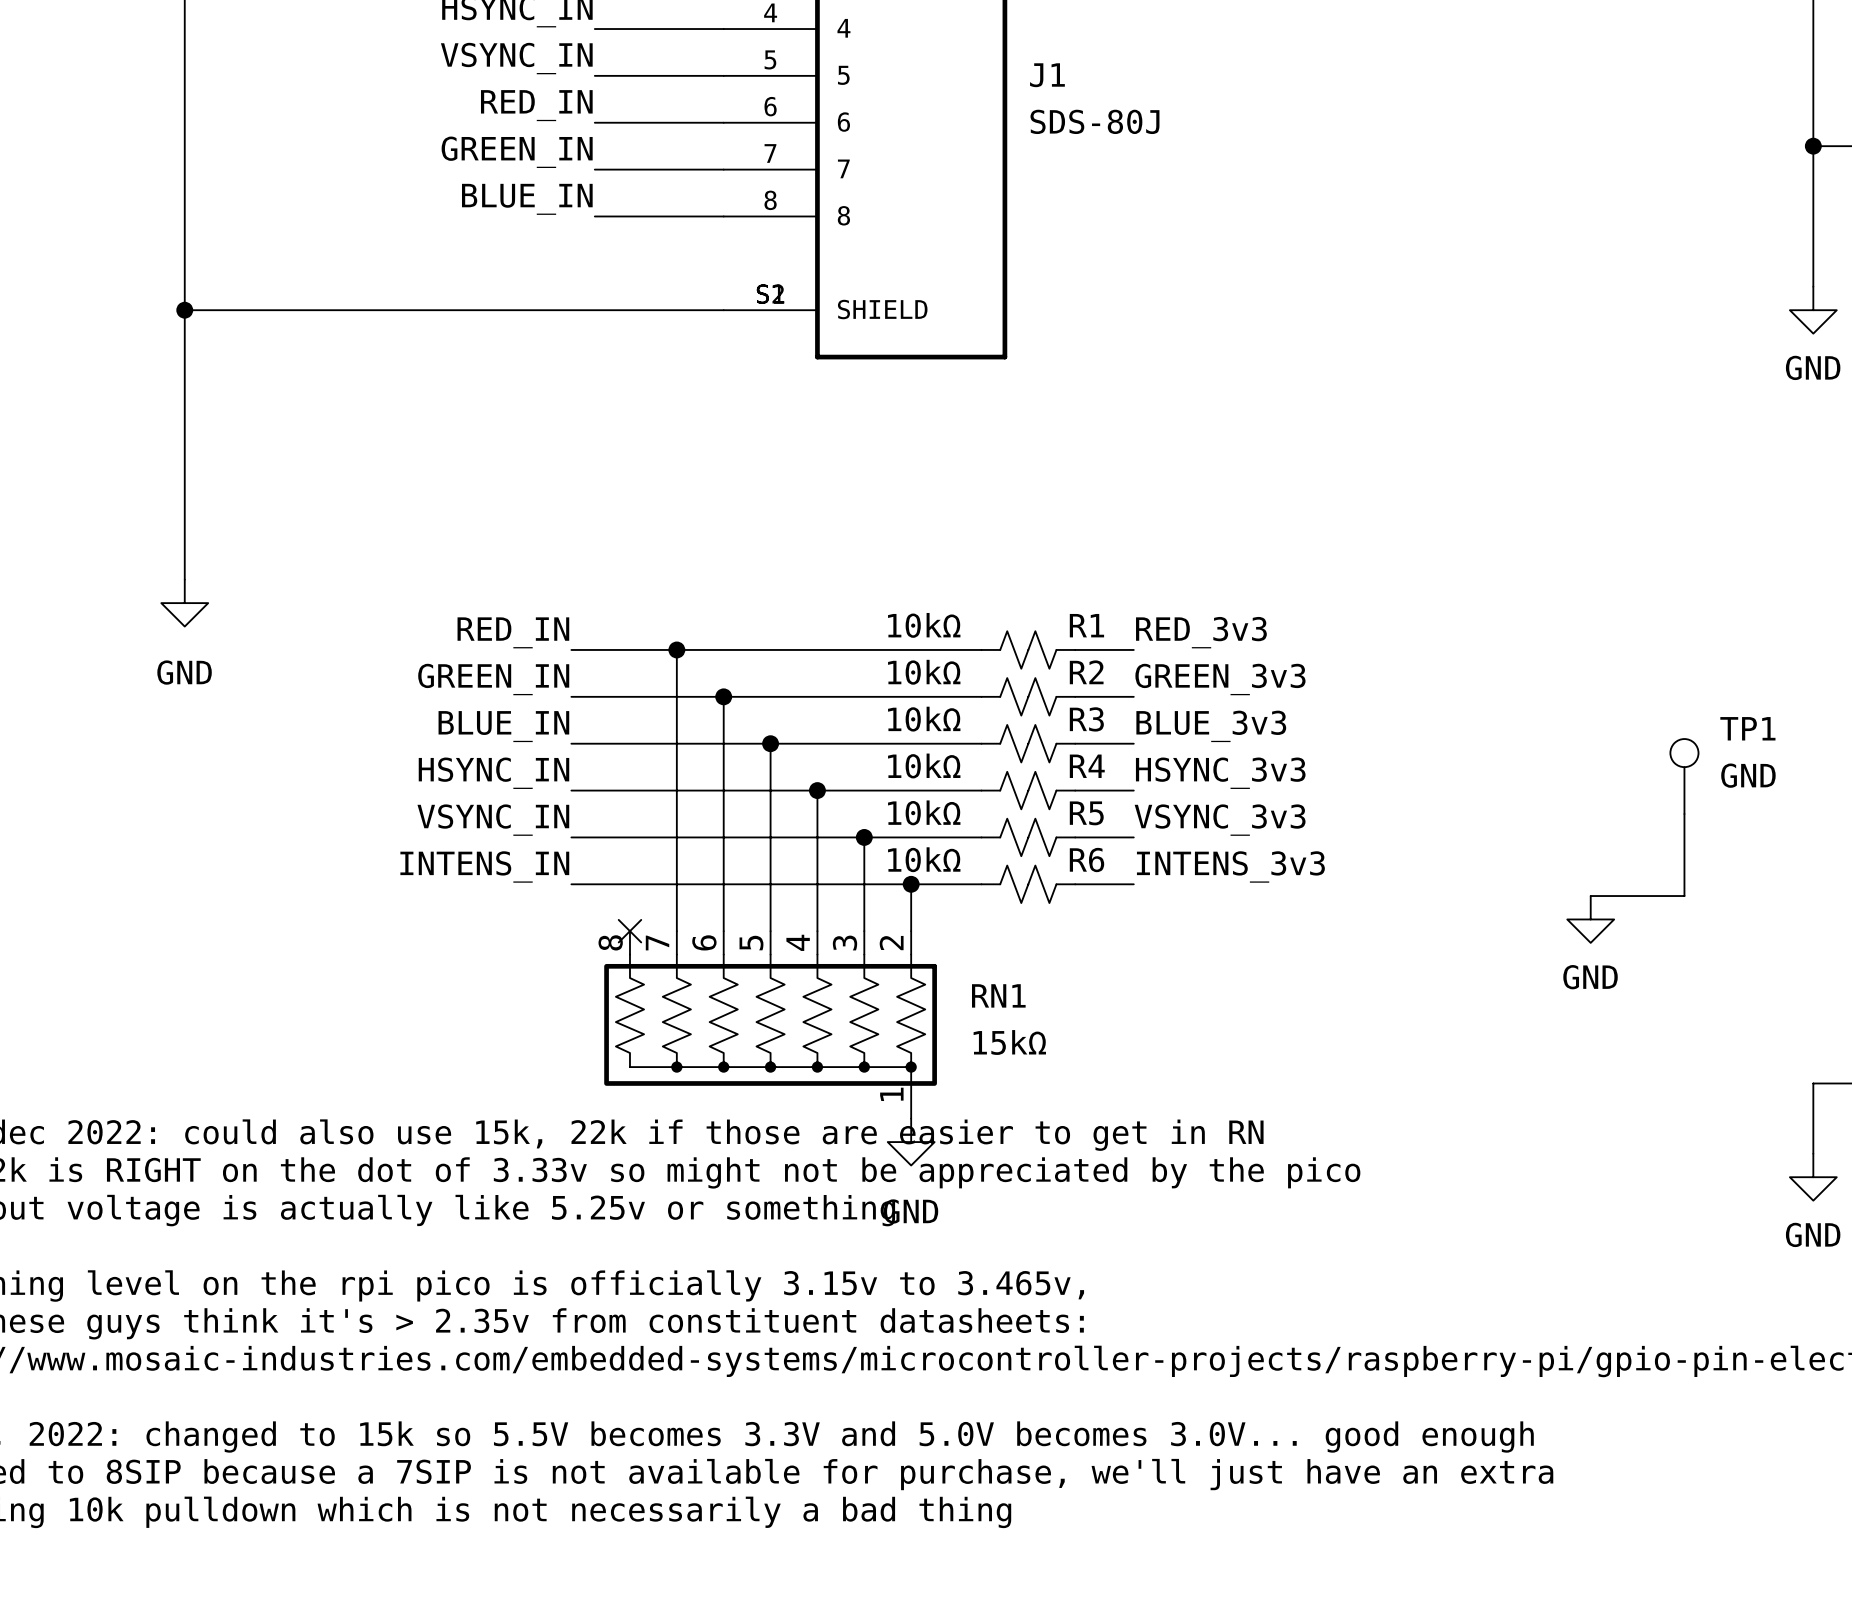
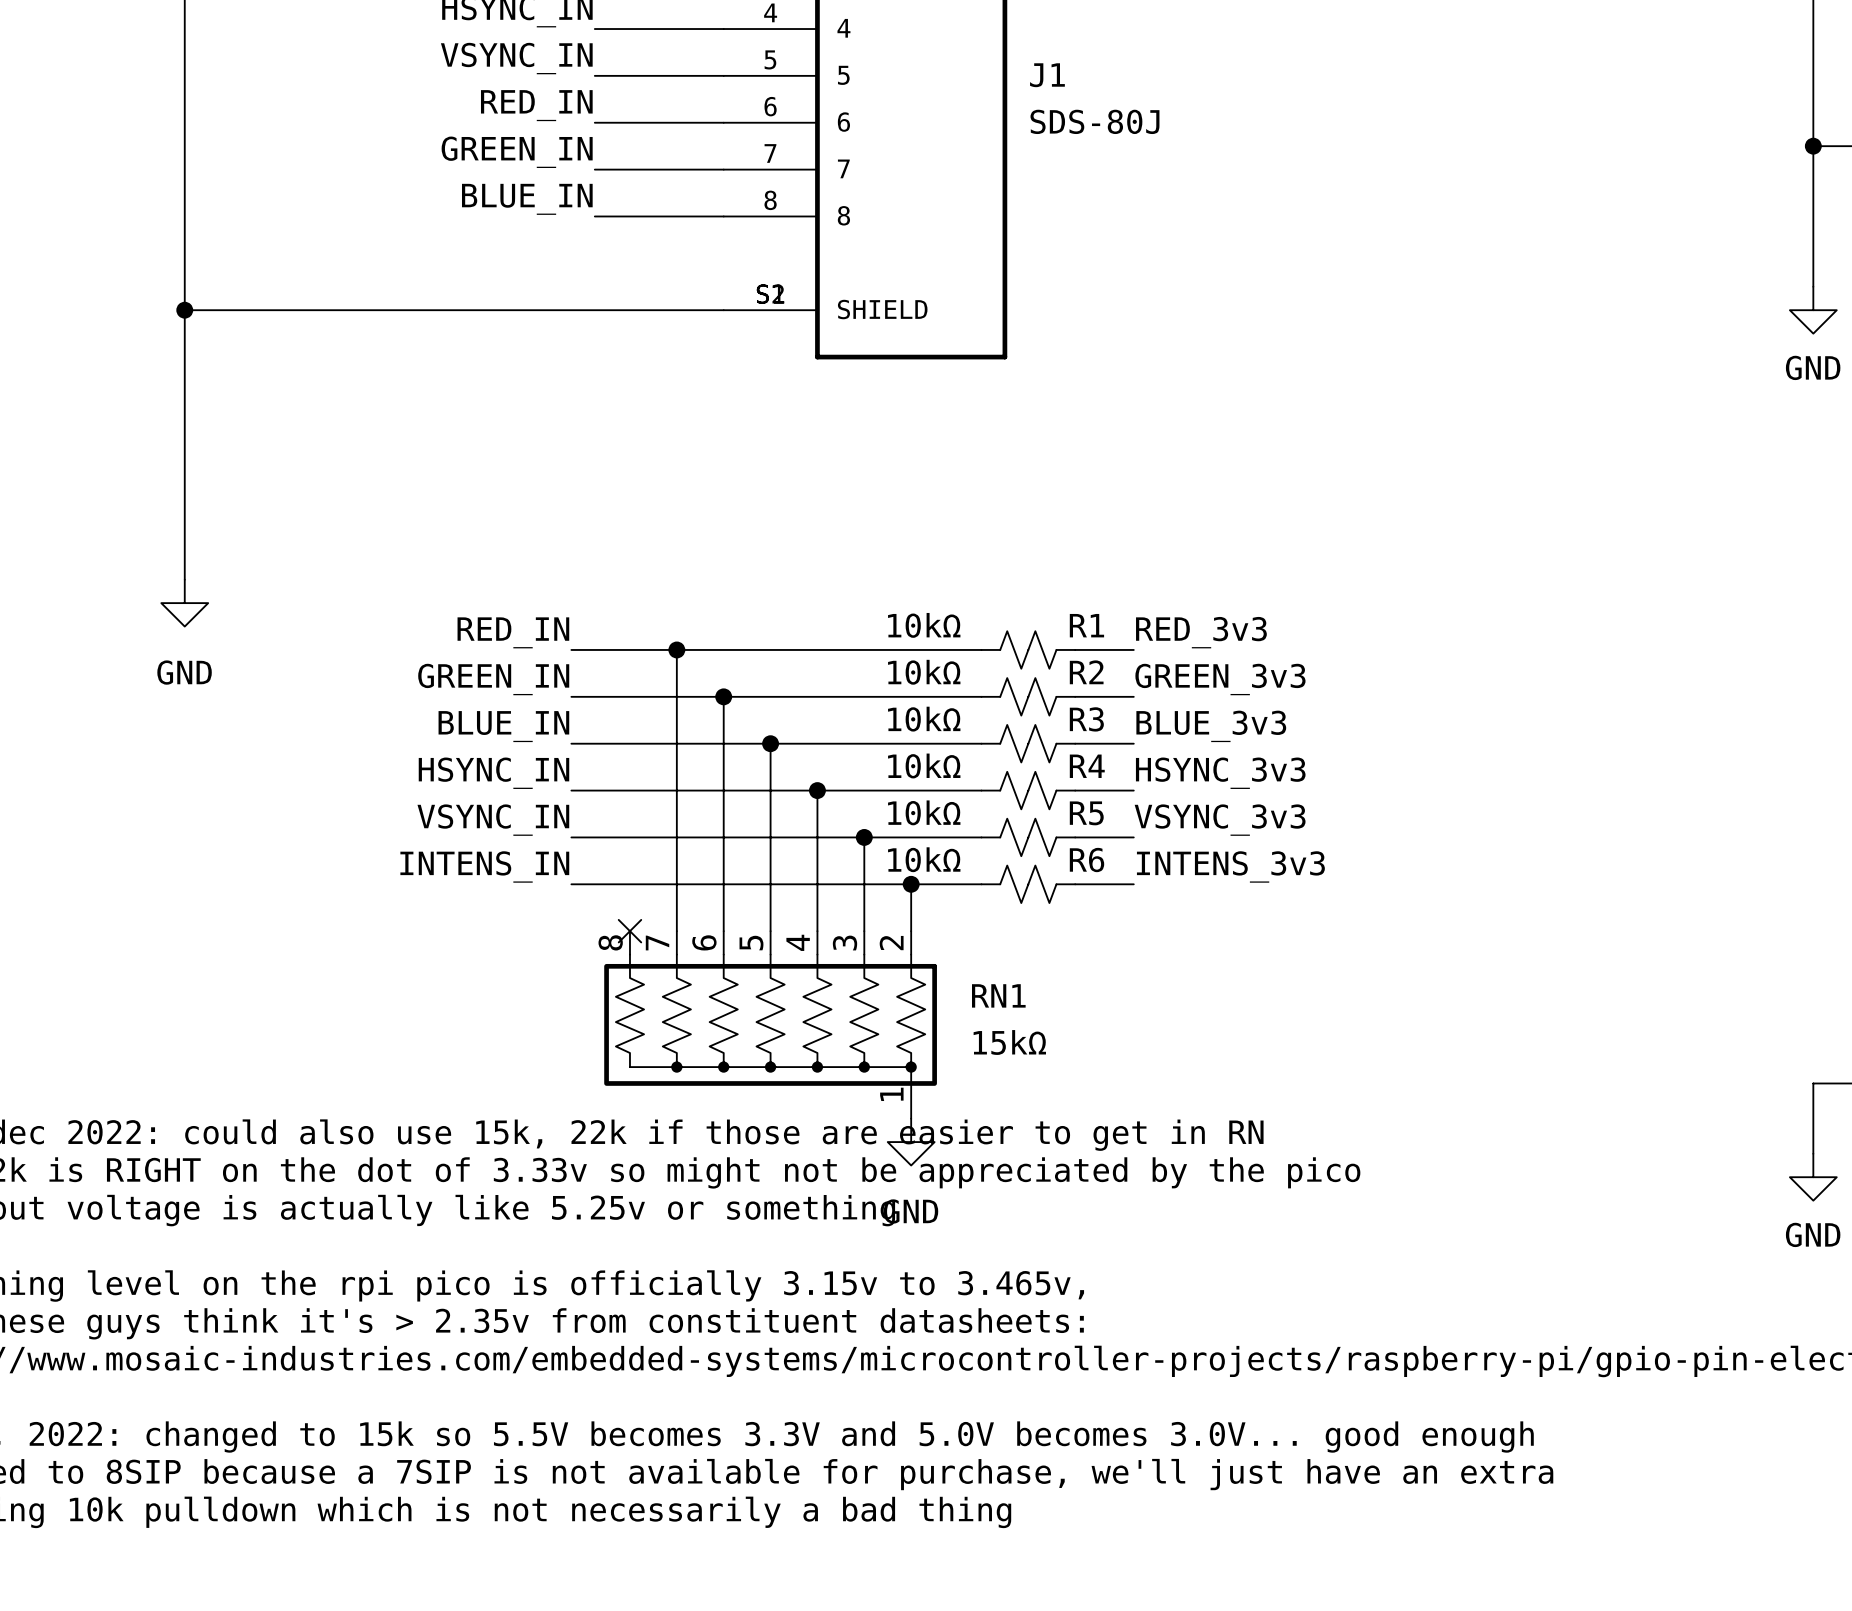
TP1: GND (1684, 776) -> none
wire: (1684, 814) (1684, 896) (1590, 896) -> none
power symbol: GND (1590, 919) -> none

